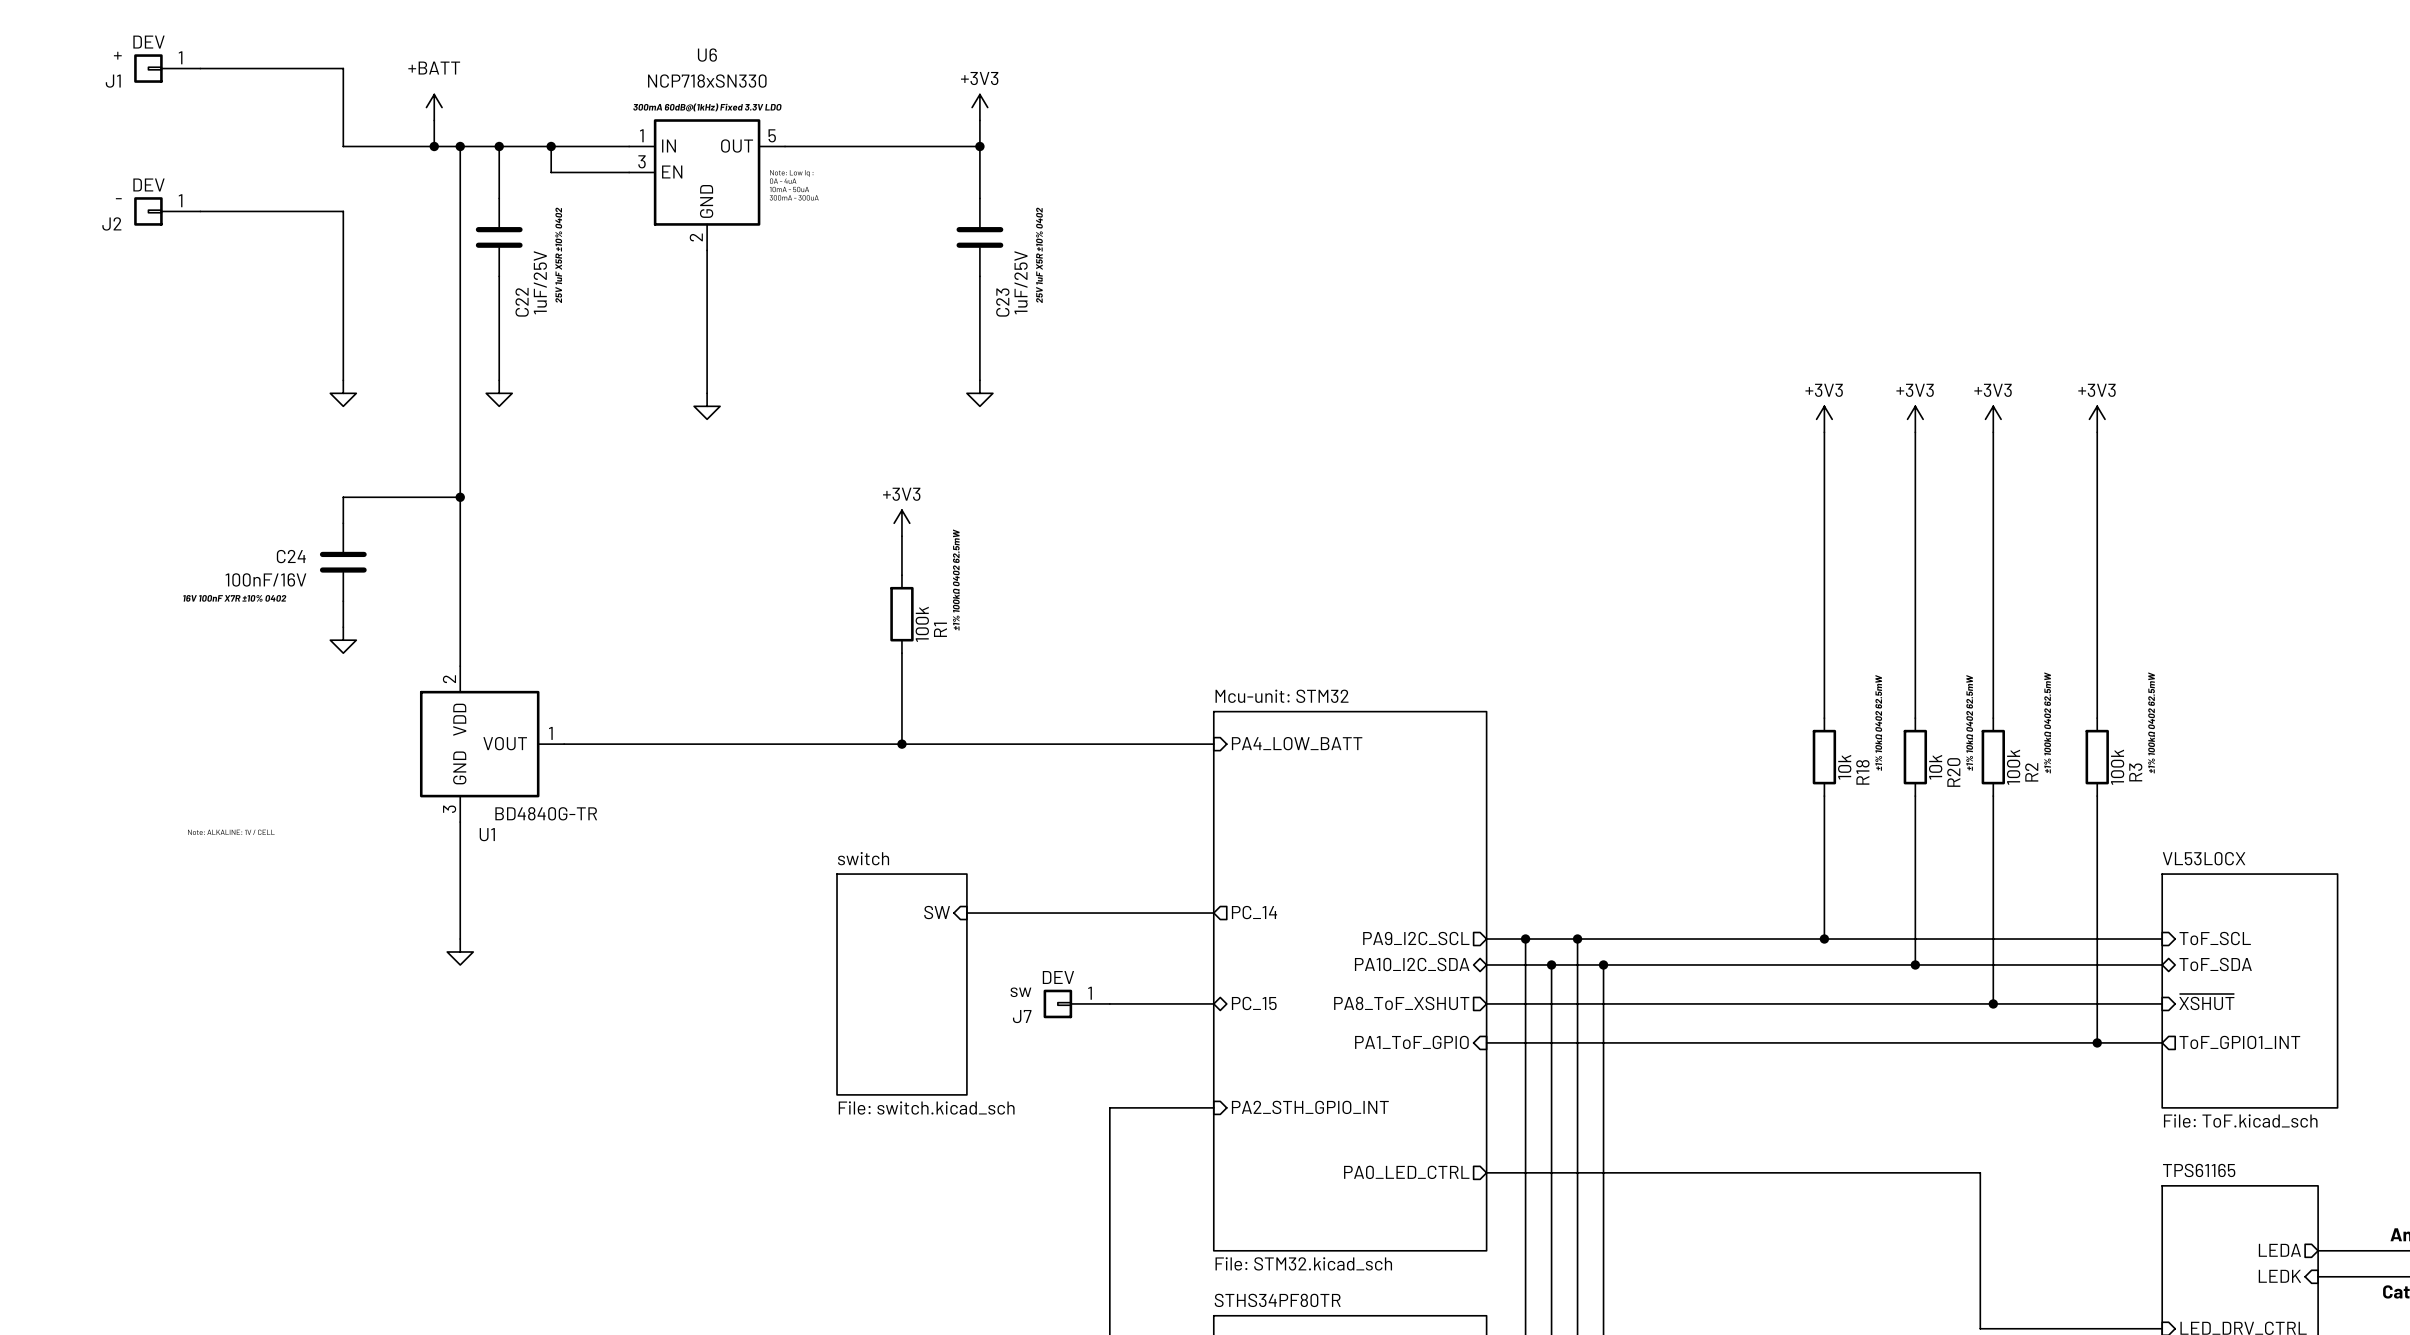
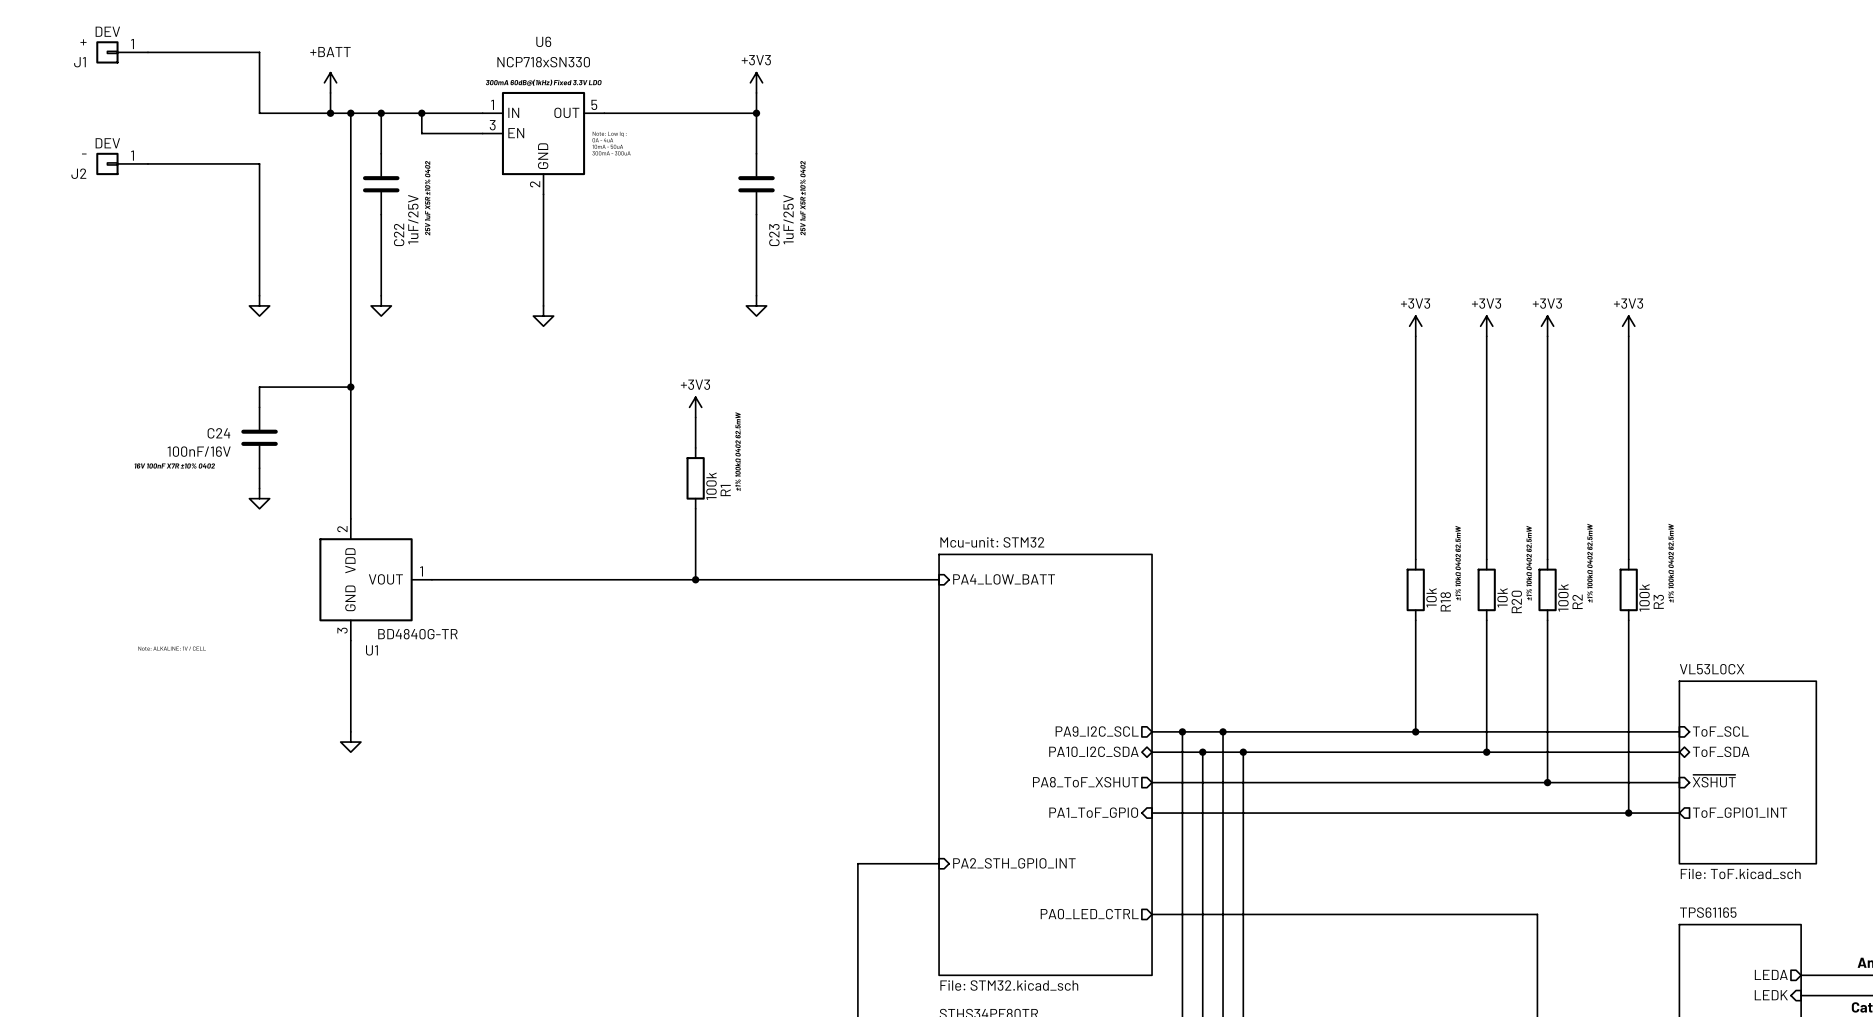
sheet pin: SW (937, 912) -> none
sheet pin: PC_14 (1254, 912) -> none
wire: (966, 913) (1213, 913) -> none
sheet switch: File: switch.kicad_sch (901, 984) -> none
J7: sw (1076, 1003) -> none
wire: (1109, 1003) (1213, 1003) -> none
sheet pin: PC_15 (1254, 1003) -> none

